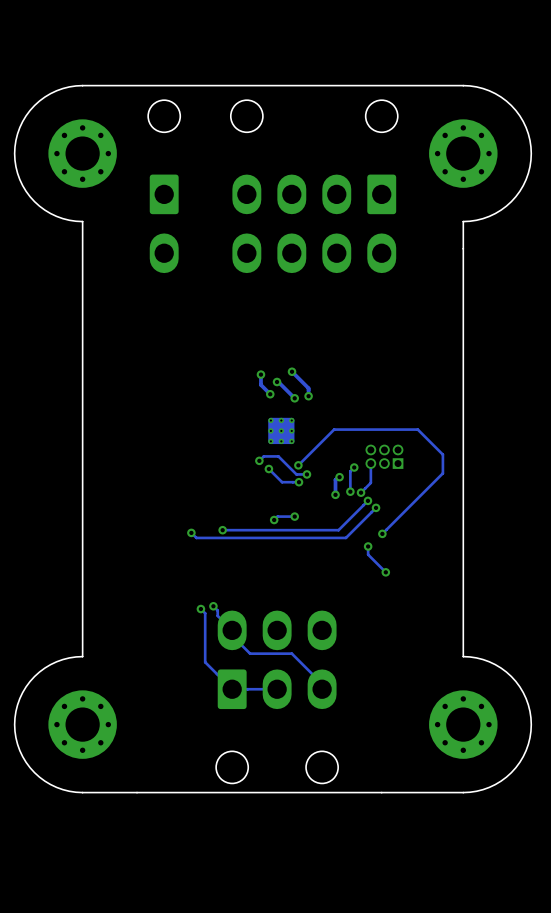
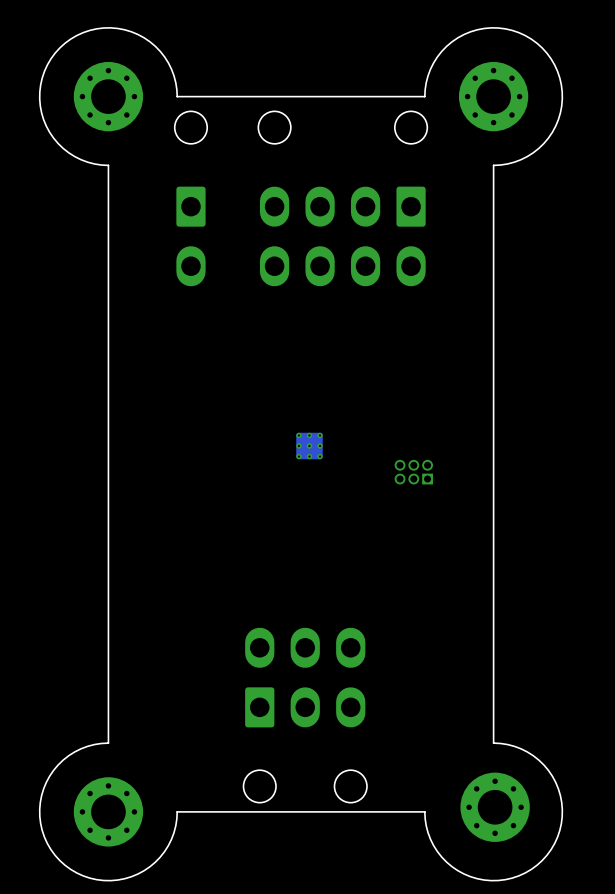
board edge: (150, 85) (82, 85) (62, 88) (39, 101) (22, 121) (15, 140) (14, 153) (15, 166) (22, 185) (34, 201) (44, 210) (62, 218) (82, 221) -> (177, 96) (171, 69) (160, 51) (144, 37) (124, 29) (103, 28) (83, 32) (59, 47) (47, 64) (40, 84) (39, 98) (41, 112) (49, 132) (58, 143) (74, 156) (94, 163) (108, 165) (108, 234)
board edge: (395, 85) (463, 85) (483, 88) (506, 101) (523, 121) (529, 140) (531, 153) (529, 166) (523, 185) (515, 196) (501, 210) (483, 218) (463, 221) -> (424, 96) (428, 75) (441, 51) (457, 37) (477, 29) (498, 28) (518, 32) (542, 47) (554, 64) (561, 84) (562, 98) (558, 119) (552, 132) (543, 143) (527, 156) (507, 163) (493, 165) (493, 234)
part position: (82, 153) -> (108, 96)
part position: (463, 153) -> (493, 96)
track: (292, 371) (308, 388) (308, 396) -> none
via: (292, 371) -> none
track: (260, 374) (260, 384) (270, 394) -> none
via: (260, 374) -> none
track: (277, 381) (294, 398) -> none
via: (277, 381) -> none
via: (270, 394) -> none
via: (308, 396) -> none
via: (294, 398) -> none
track: (259, 460) (263, 456) (278, 456) (296, 474) (306, 474) -> none
via: (259, 460) -> none
track: (370, 463) (370, 482) (361, 492) -> none
track: (298, 465) (334, 429) (417, 429) (442, 454) (442, 473) (382, 533) -> none
via: (298, 465) -> none
track: (354, 467) (350, 471) (350, 491) -> none
via: (354, 467) -> none
track: (268, 469) (282, 482) (298, 482) -> none
via: (268, 469) -> none
via: (306, 474) -> none
track: (339, 477) (335, 479) (335, 494) -> none
via: (339, 477) -> none
via: (298, 482) -> none
via: (350, 491) -> none
via: (361, 492) -> none
via: (335, 494) -> none
track: (367, 500) (338, 530) (222, 530) -> none
via: (367, 500) -> none
track: (376, 507) (345, 537) (196, 537) (191, 532) -> none
via: (376, 507) -> none
track: (294, 516) (277, 516) (274, 520) -> none
via: (294, 516) -> none
via: (274, 520) -> none
via: (222, 530) -> none
via: (191, 532) -> none
via: (382, 533) -> none
track: (368, 546) (368, 554) (385, 572) -> none
via: (368, 546) -> none
via: (385, 572) -> none
track: (213, 606) (217, 610) (217, 615) (232, 630) (232, 635) (250, 653) (291, 653) (322, 683) (322, 689) -> none
via: (213, 606) -> none
track: (200, 609) (205, 613) (205, 662) (232, 689) (277, 689) -> none
via: (200, 609) -> none
board edge: (82, 656) (62, 659) (50, 664) (34, 676) (26, 686) (17, 704) (14, 717) (15, 737) (22, 756) (39, 777) (62, 789) (82, 792) (150, 792) -> (108, 674) (108, 743) (94, 744) (74, 751) (58, 764) (49, 776) (43, 788) (39, 809) (40, 823) (47, 843) (65, 865) (83, 875) (103, 880) (124, 878) (144, 870) (160, 857) (171, 839) (177, 811)
board edge: (463, 656) (483, 659) (495, 664) (511, 676) (523, 692) (528, 704) (531, 724) (528, 744) (523, 756) (506, 777) (483, 789) (463, 792) (395, 792) -> (493, 674) (493, 743) (514, 746) (527, 751) (538, 760) (552, 776) (558, 788) (562, 809) (561, 823) (554, 843) (537, 865) (518, 875) (498, 880) (477, 878) (457, 870) (441, 857) (428, 832) (424, 811)
part position: (82, 724) -> (108, 811)
part position: (463, 724) -> (495, 807)

